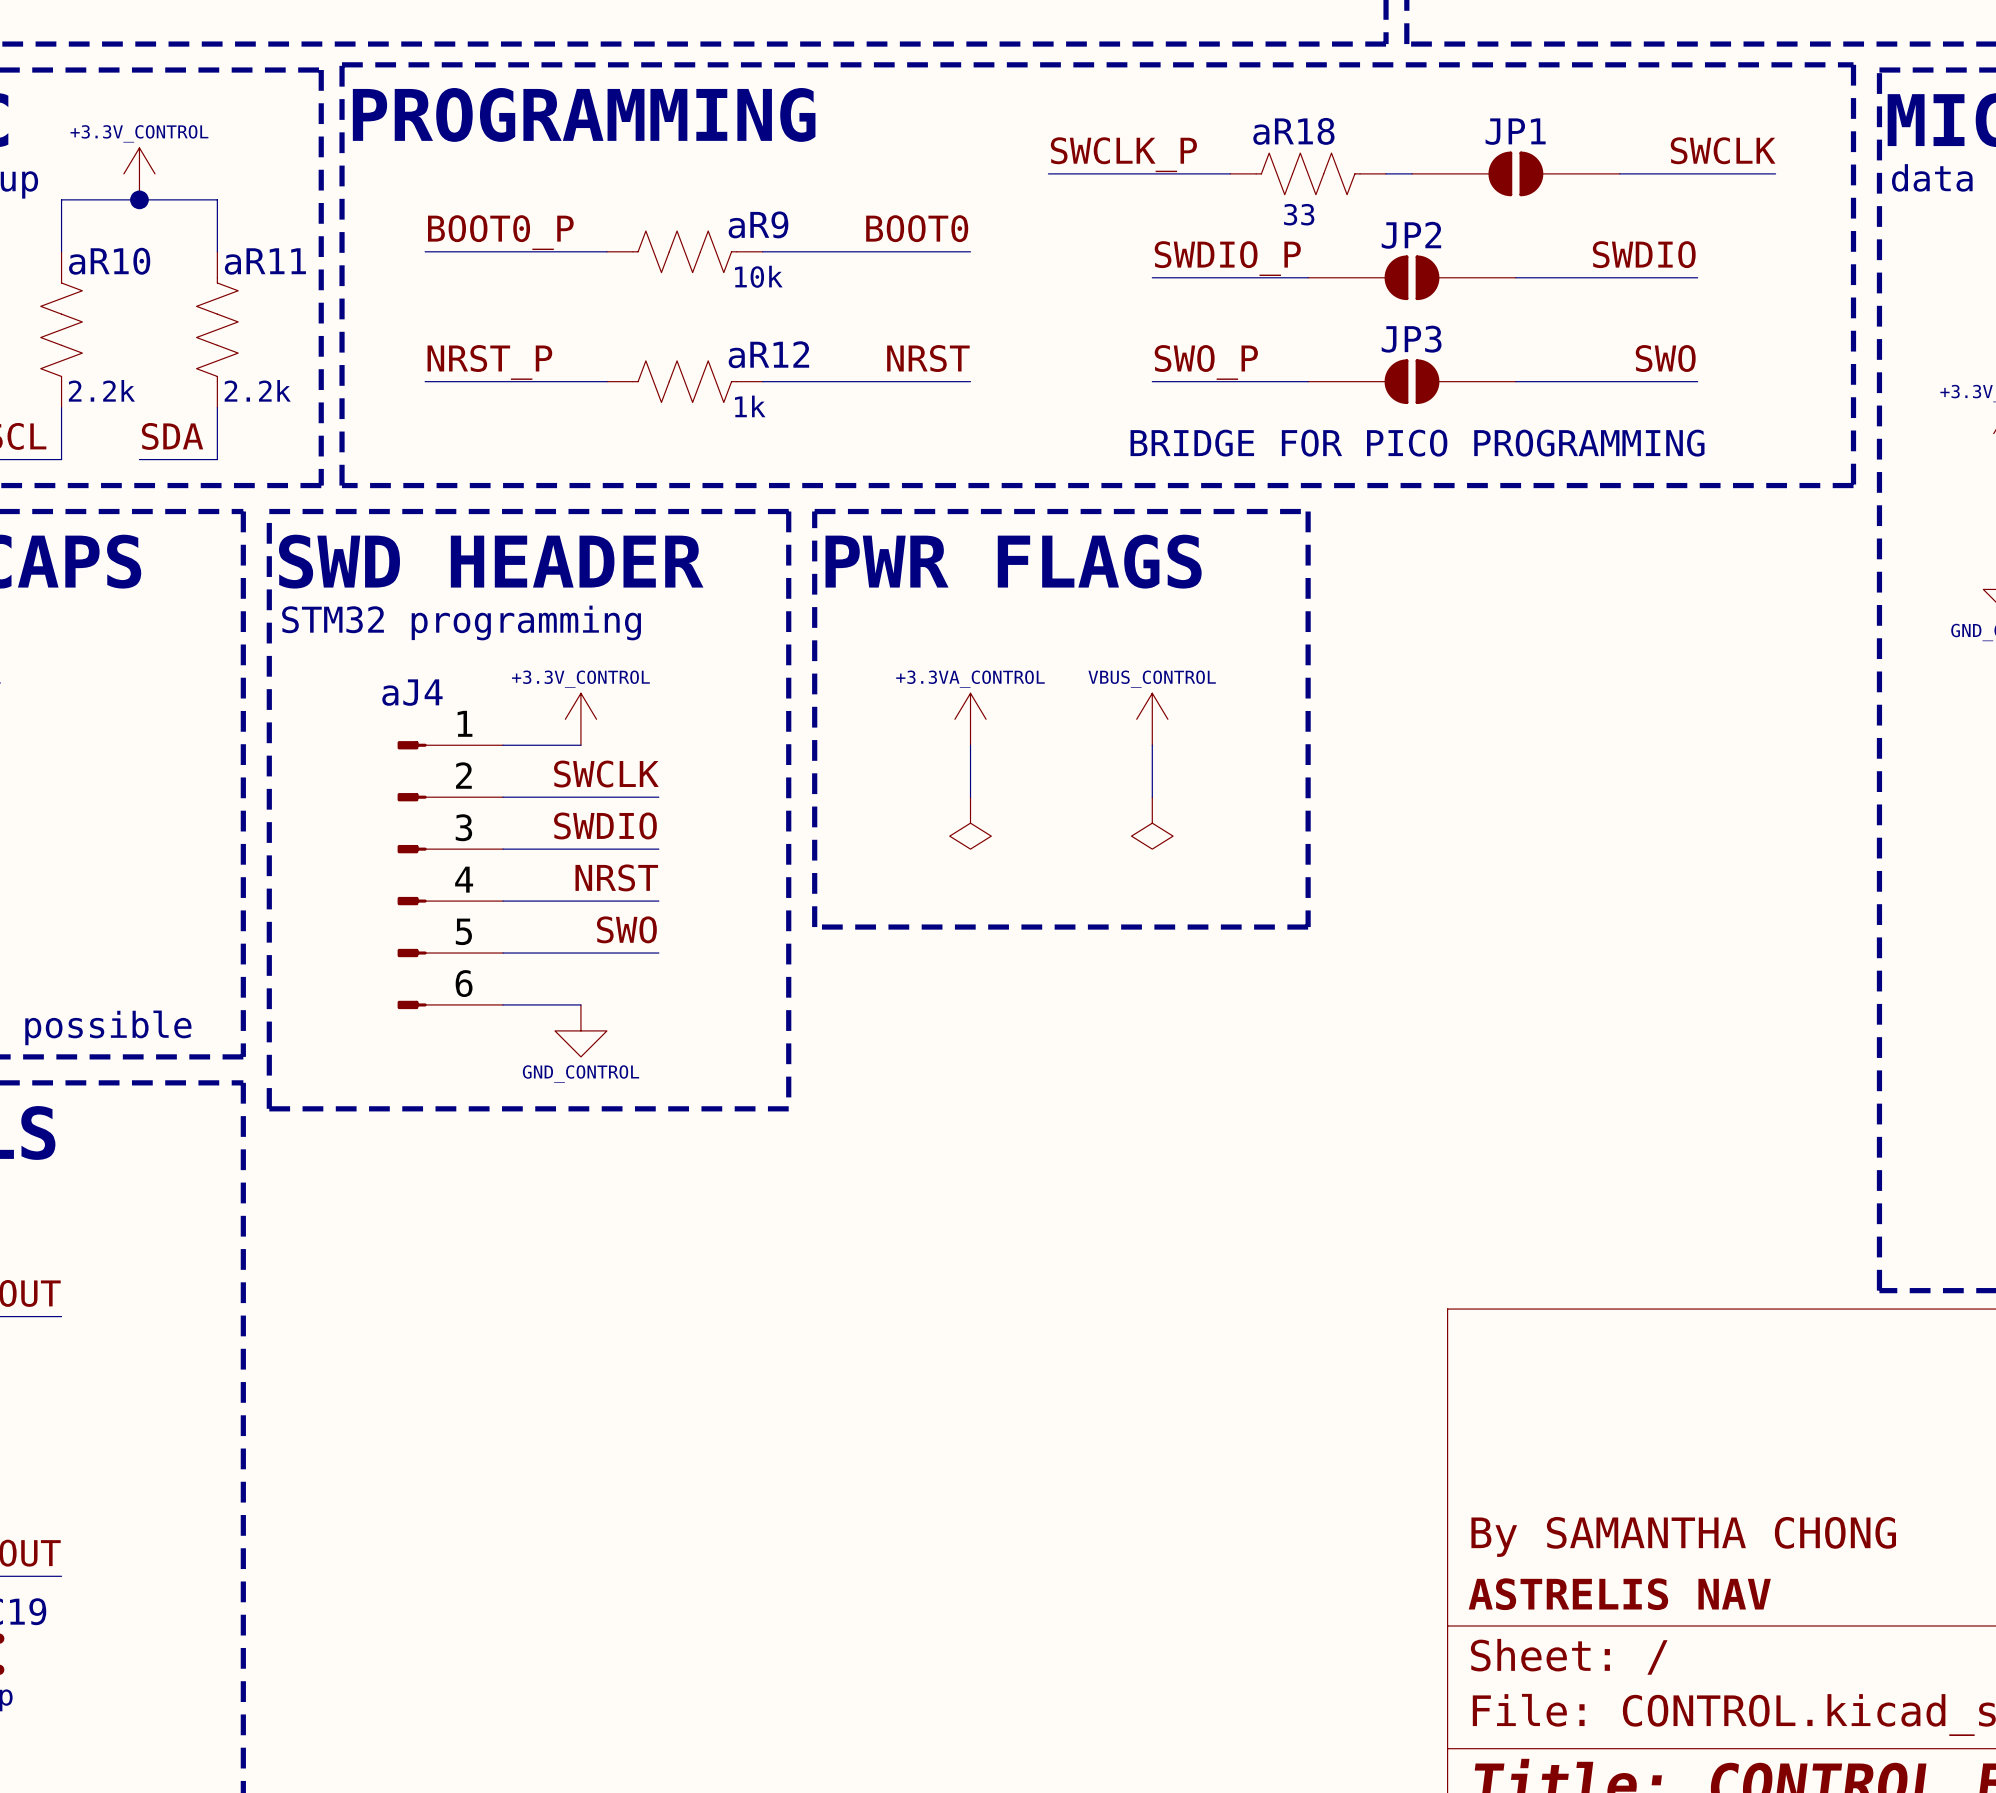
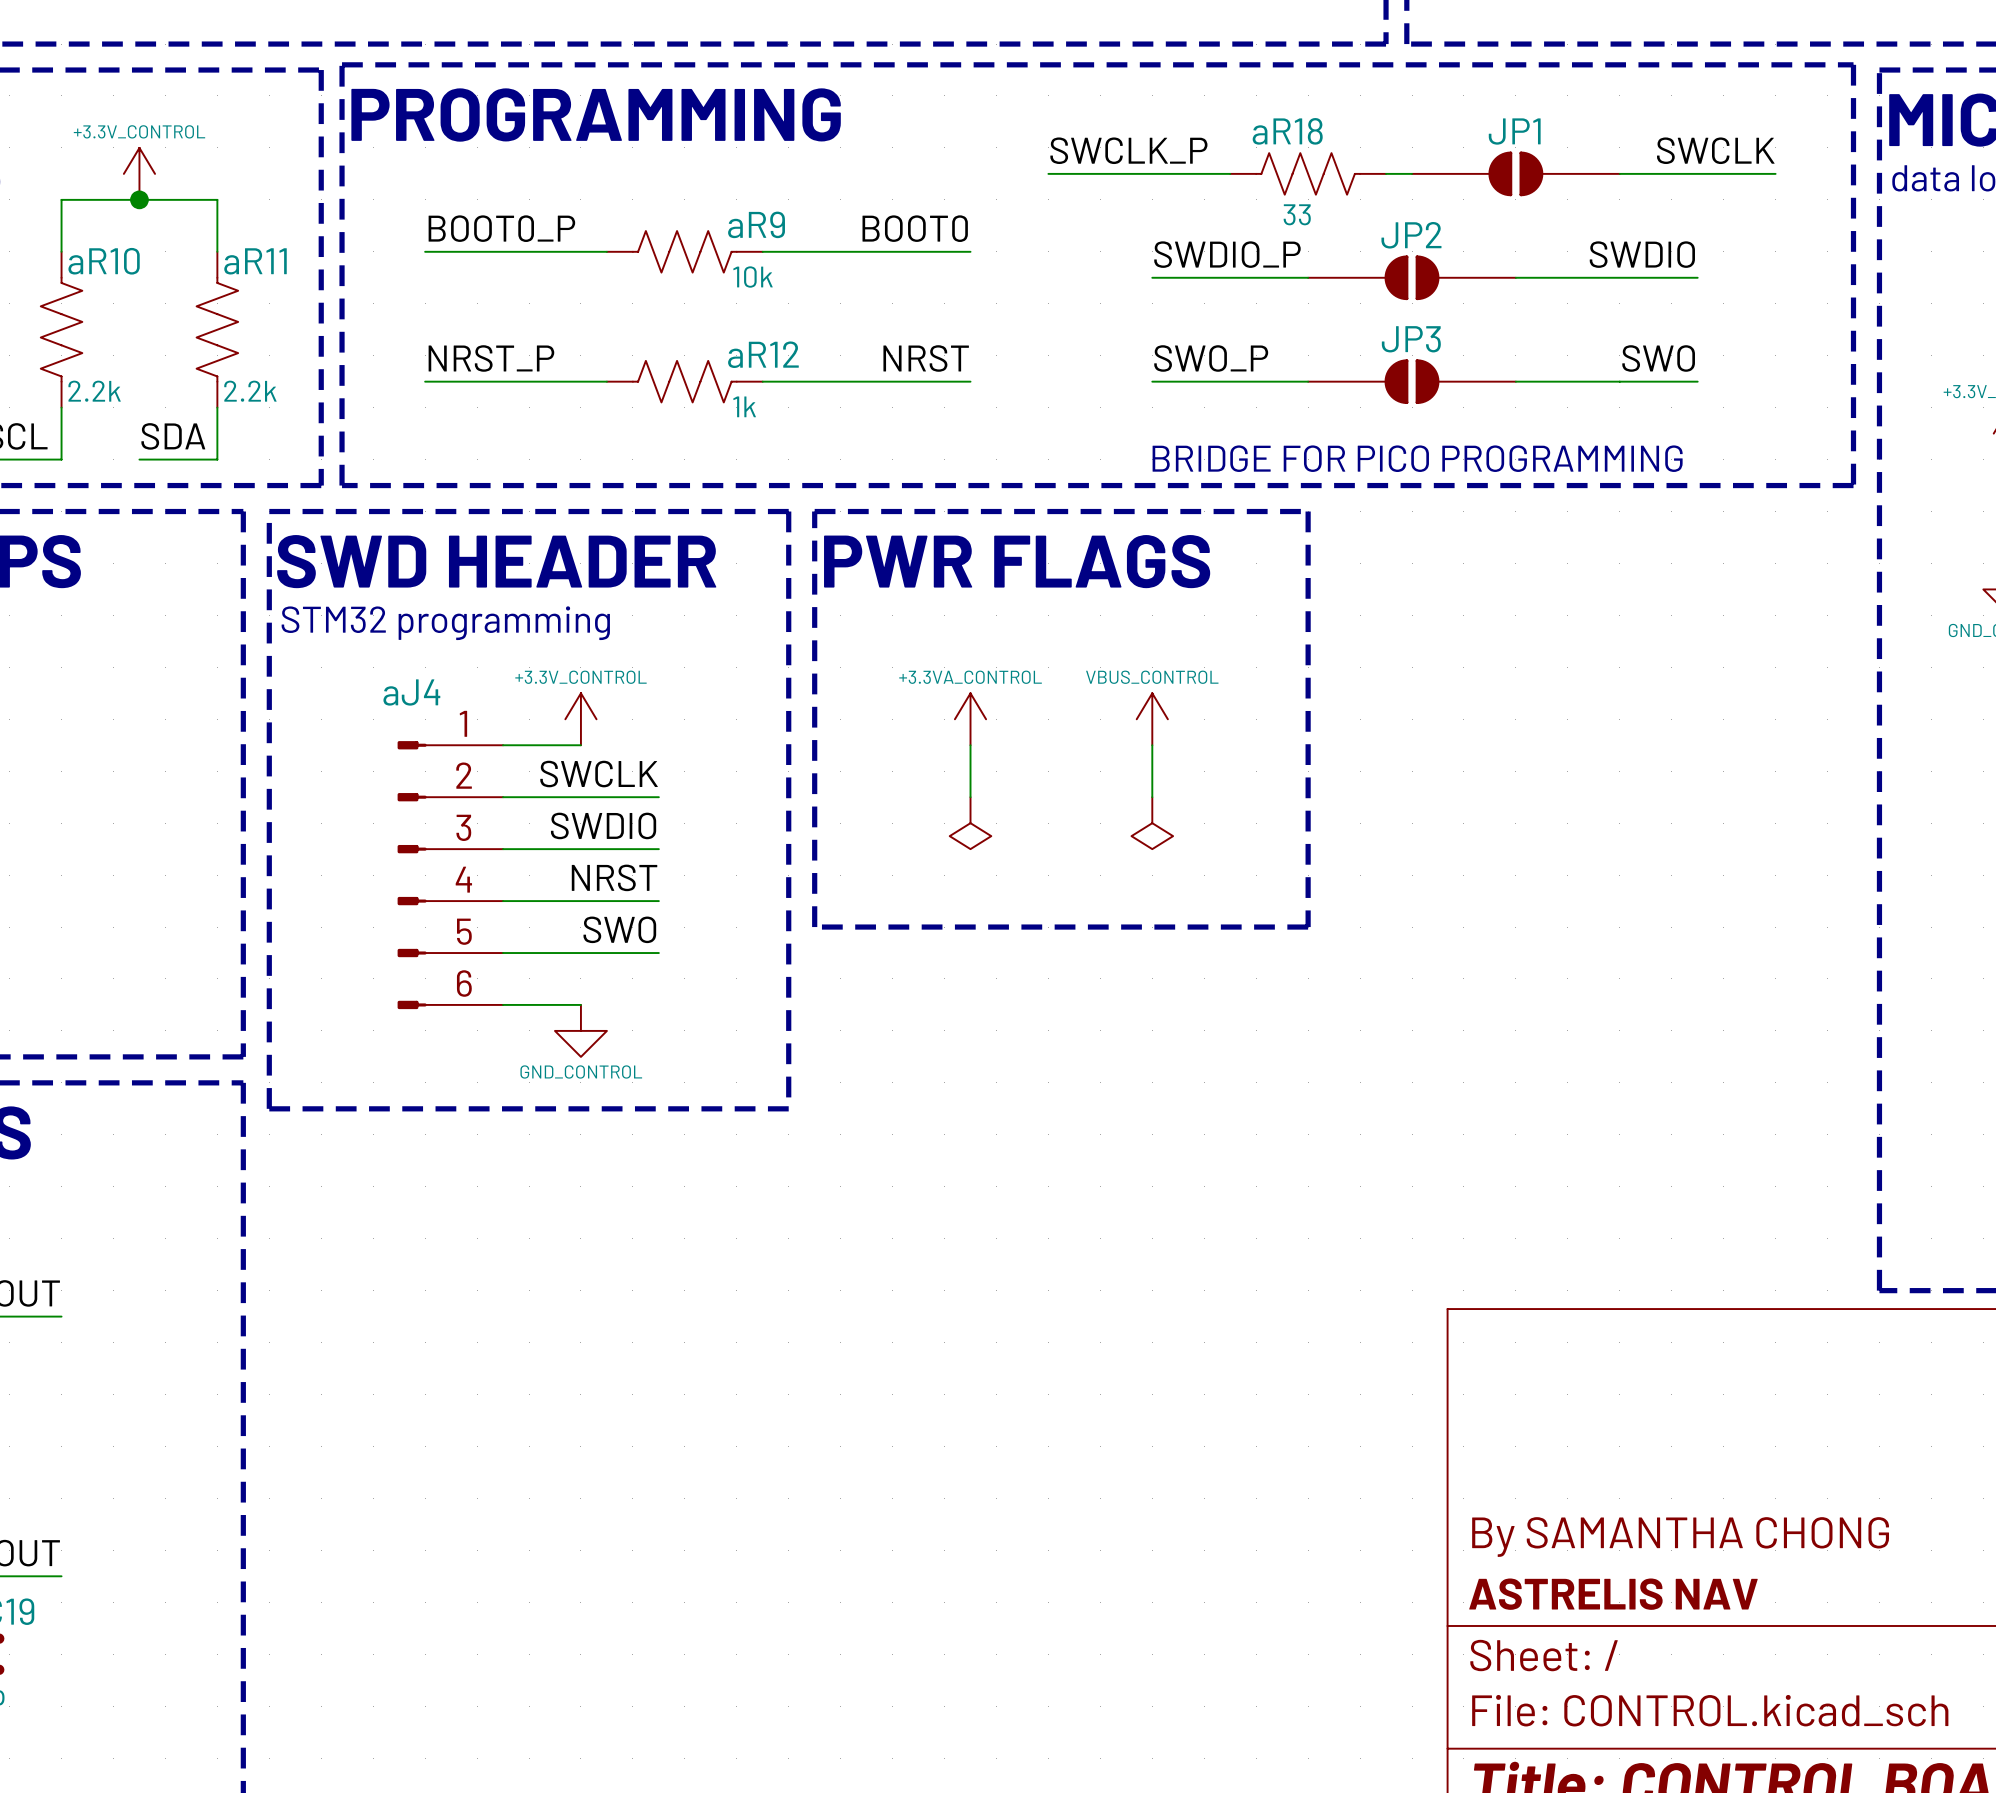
text position: BRIDGE FOR PICO PROGRAMMING (1417, 443) -> BRIDGE FOR PICO PROGRAMMING (1417, 458)

